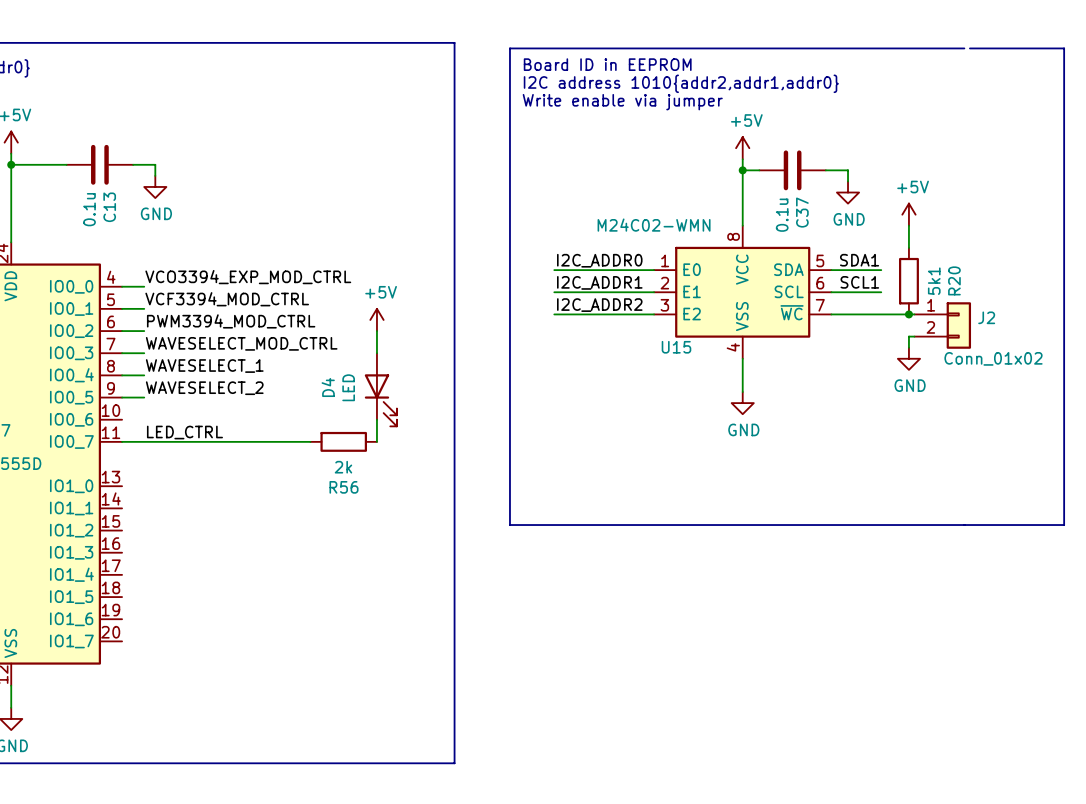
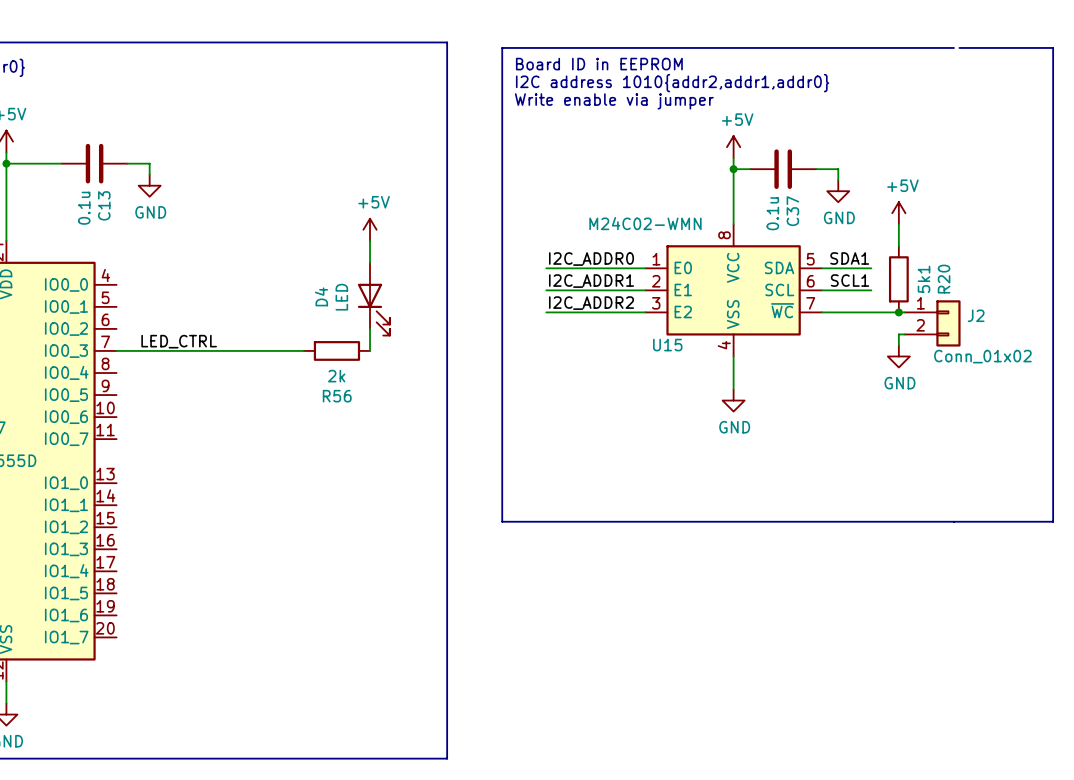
label: VCO3394_EXP_MOD_CTRL (248, 277) -> none
wire: (122, 286) (144, 286) -> none
label: VCF3394_MOD_CTRL (227, 299) -> none
wire: (122, 308) (144, 308) -> none
power symbol position: +5V (376, 319) -> +5V (370, 229)
label: PWM3394_MOD_CTRL (231, 321) -> none
wire: (122, 331) (144, 331) -> none
label: WAVESELECT_MOD_CTRL (241, 343) -> LED_CTRL (179, 341)
wire: none -> (138, 350) (303, 350)
label: WAVESELECT_1 (204, 366) -> none
wire: (122, 375) (144, 375) -> none
label: WAVESELECT_2 (204, 388) -> none
D4 position: (380, 389) -> (373, 299)
wire: (122, 397) (144, 397) -> none
wire: (376, 419) (376, 441) -> (370, 240) (370, 262)
label: LED_CTRL (184, 432) -> none
wire: (122, 441) (310, 441) -> none
R56 position: (343, 441) -> (336, 350)

